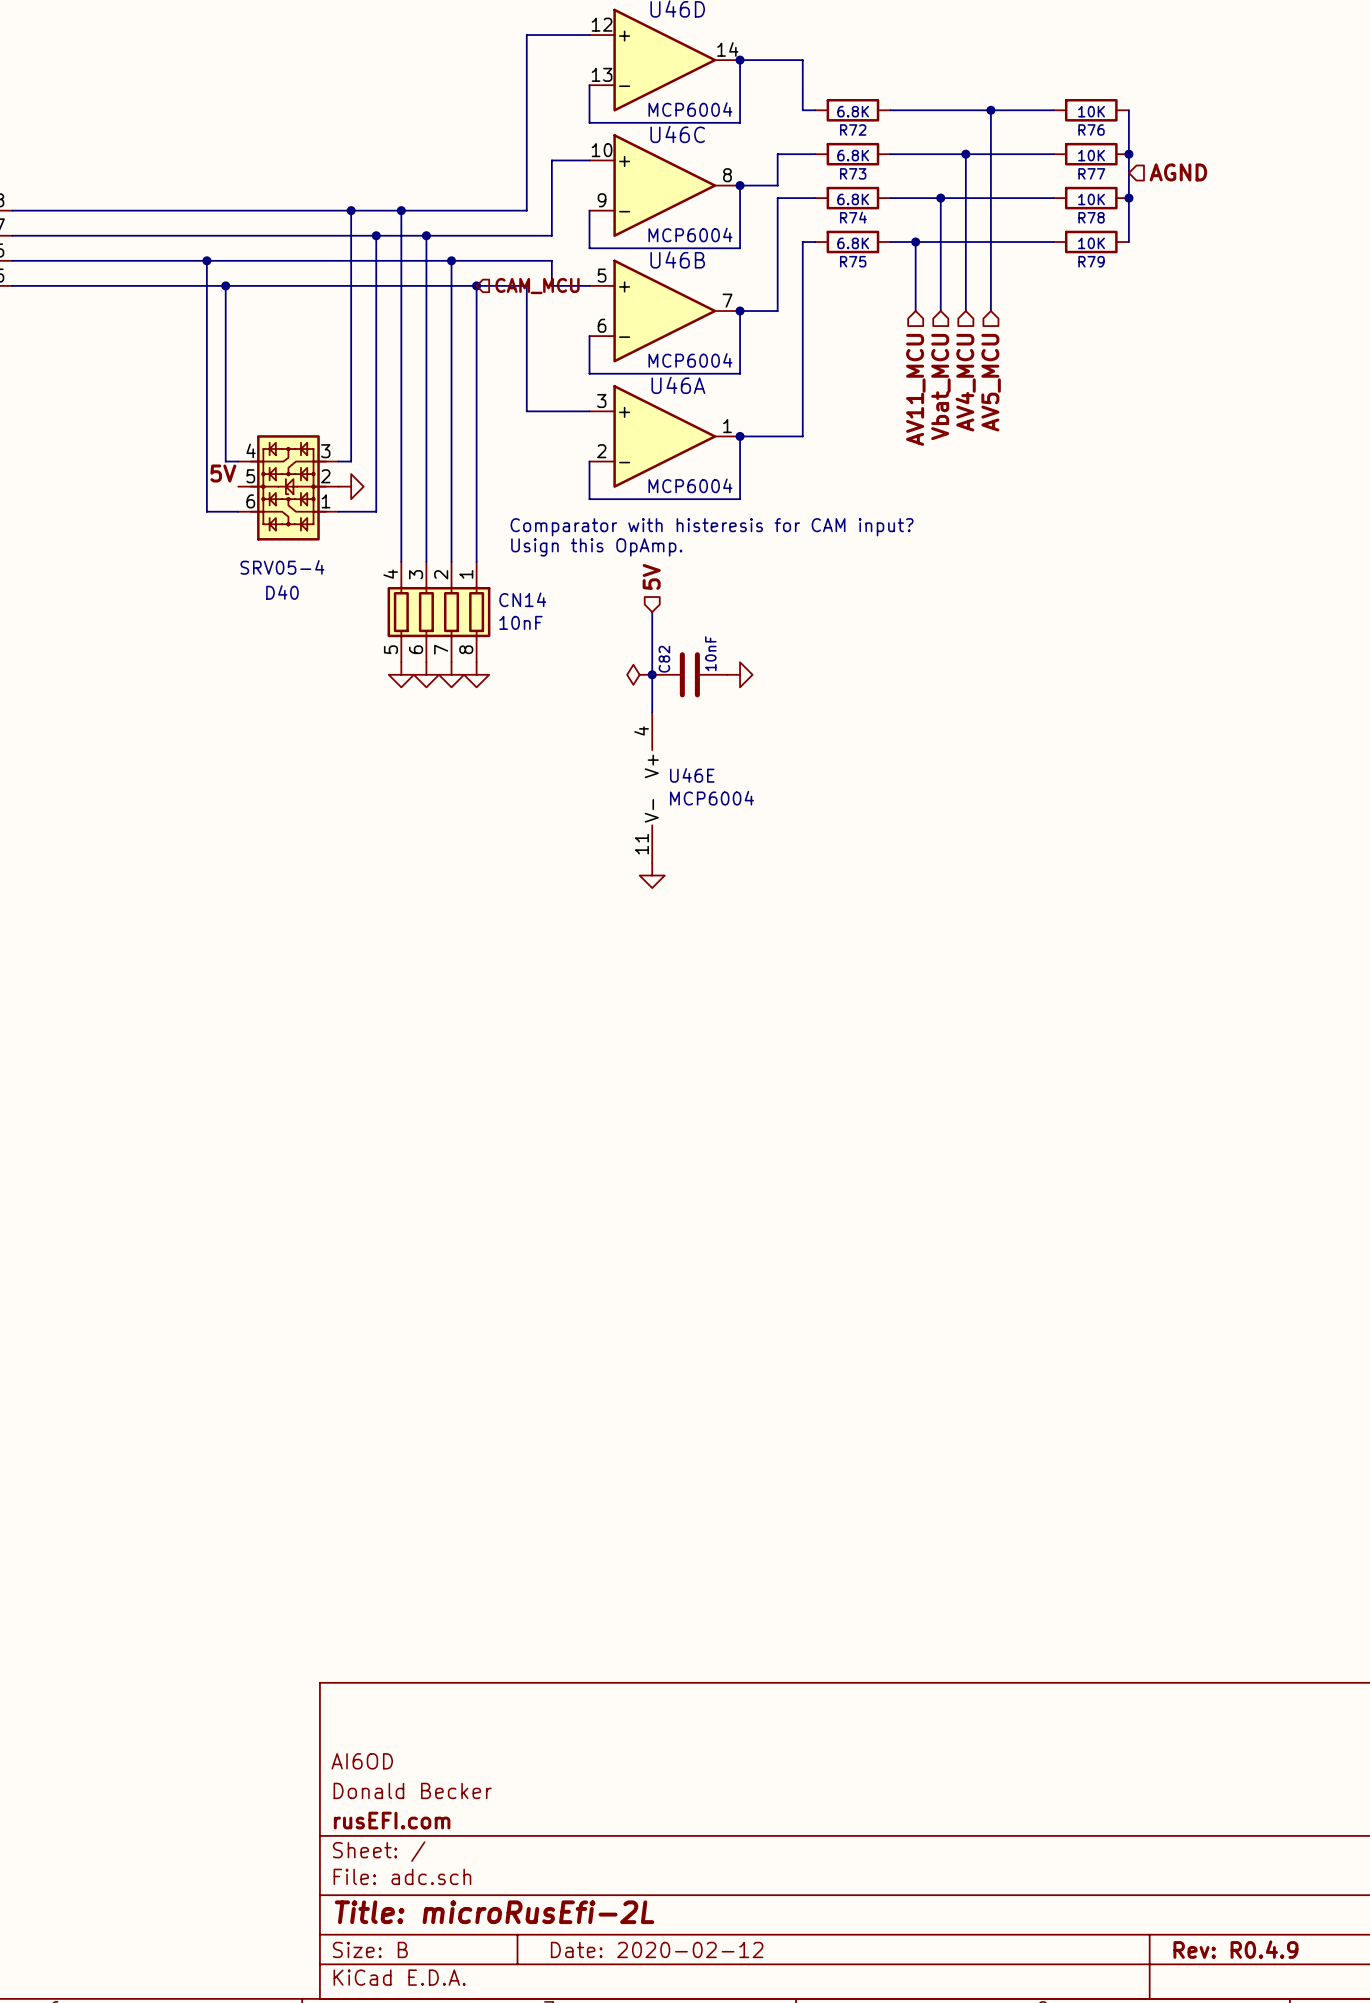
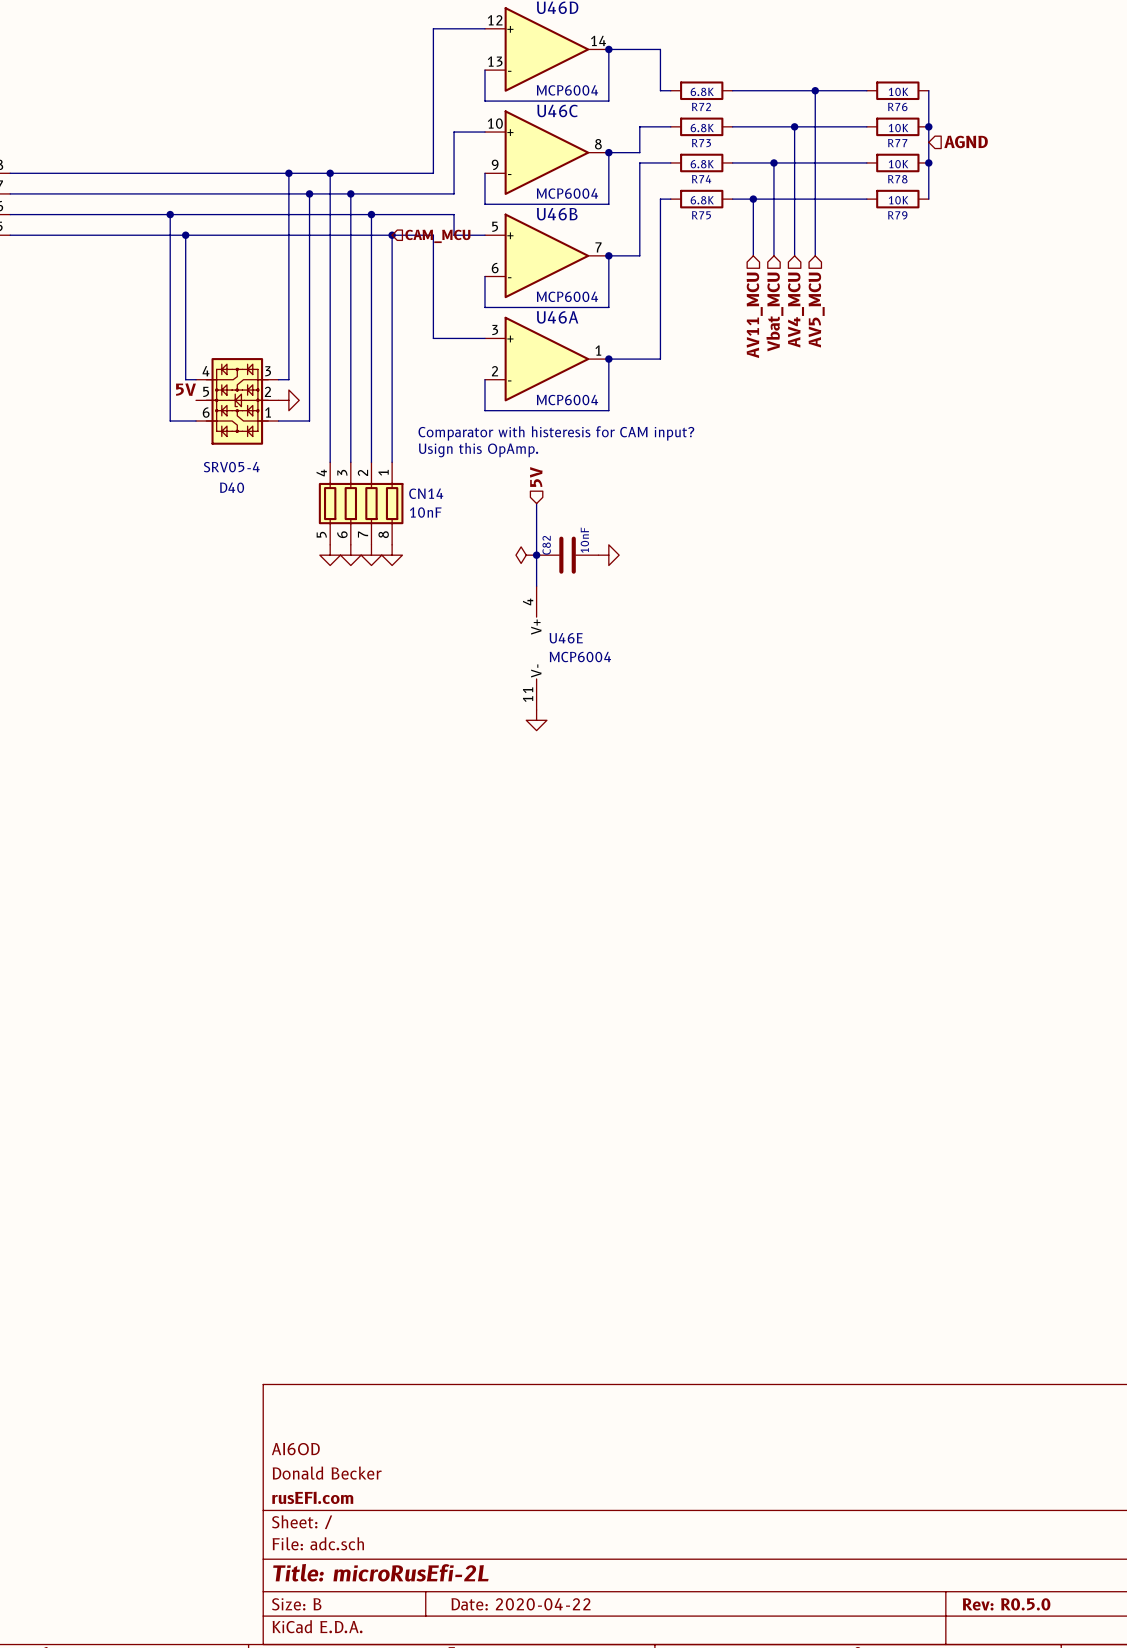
title block: Date: 2020-02-12 (657, 1949) -> Date: 2020-04-22 (521, 1604)
title block: Rev: R0.4.9 (1235, 1949) -> Rev: R0.5.0 (1006, 1604)

